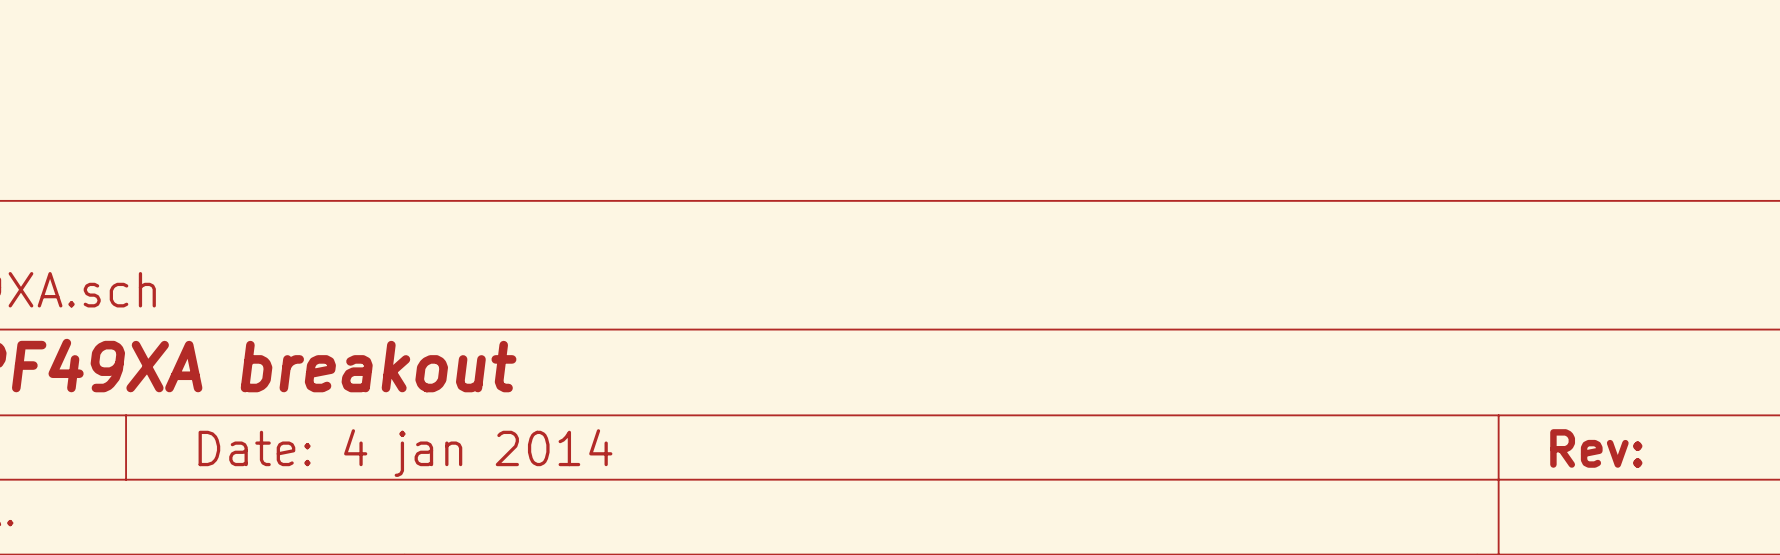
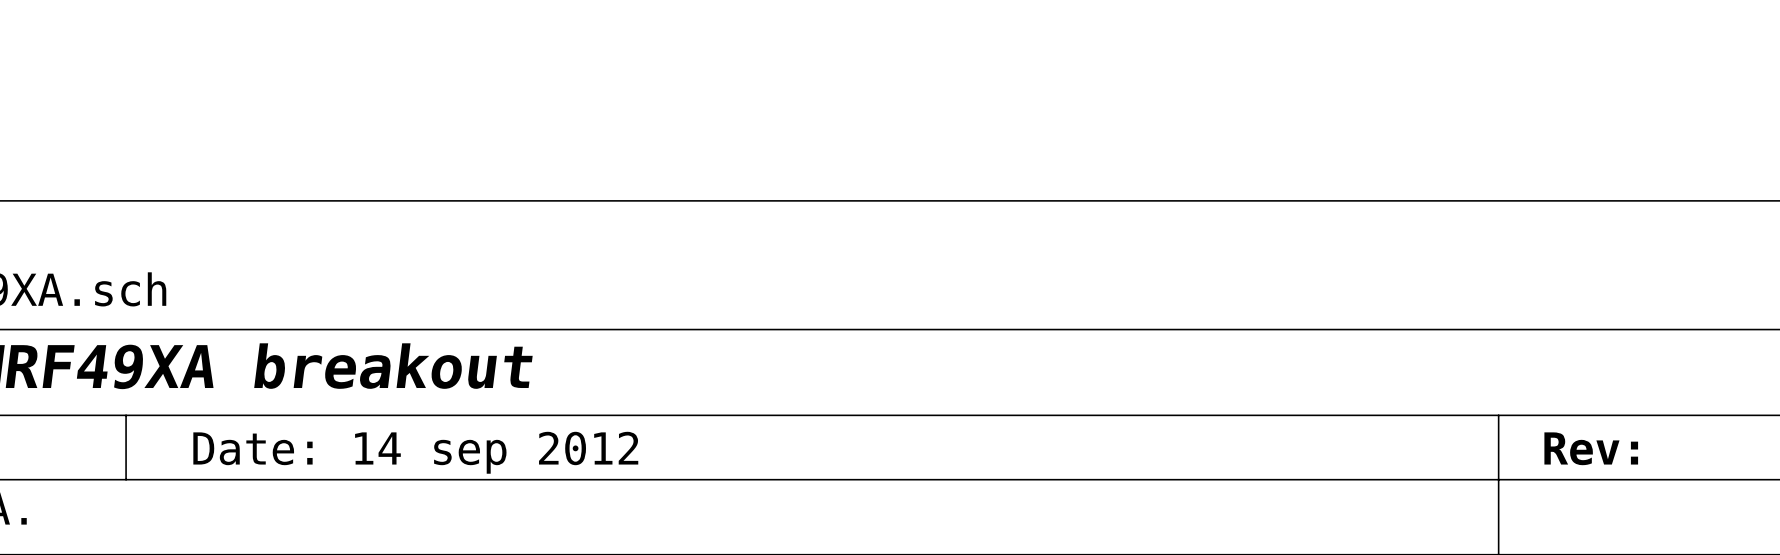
title block: Date: 4 jan 2014 (405, 453) -> Date: 14 sep 2012 (415, 452)

